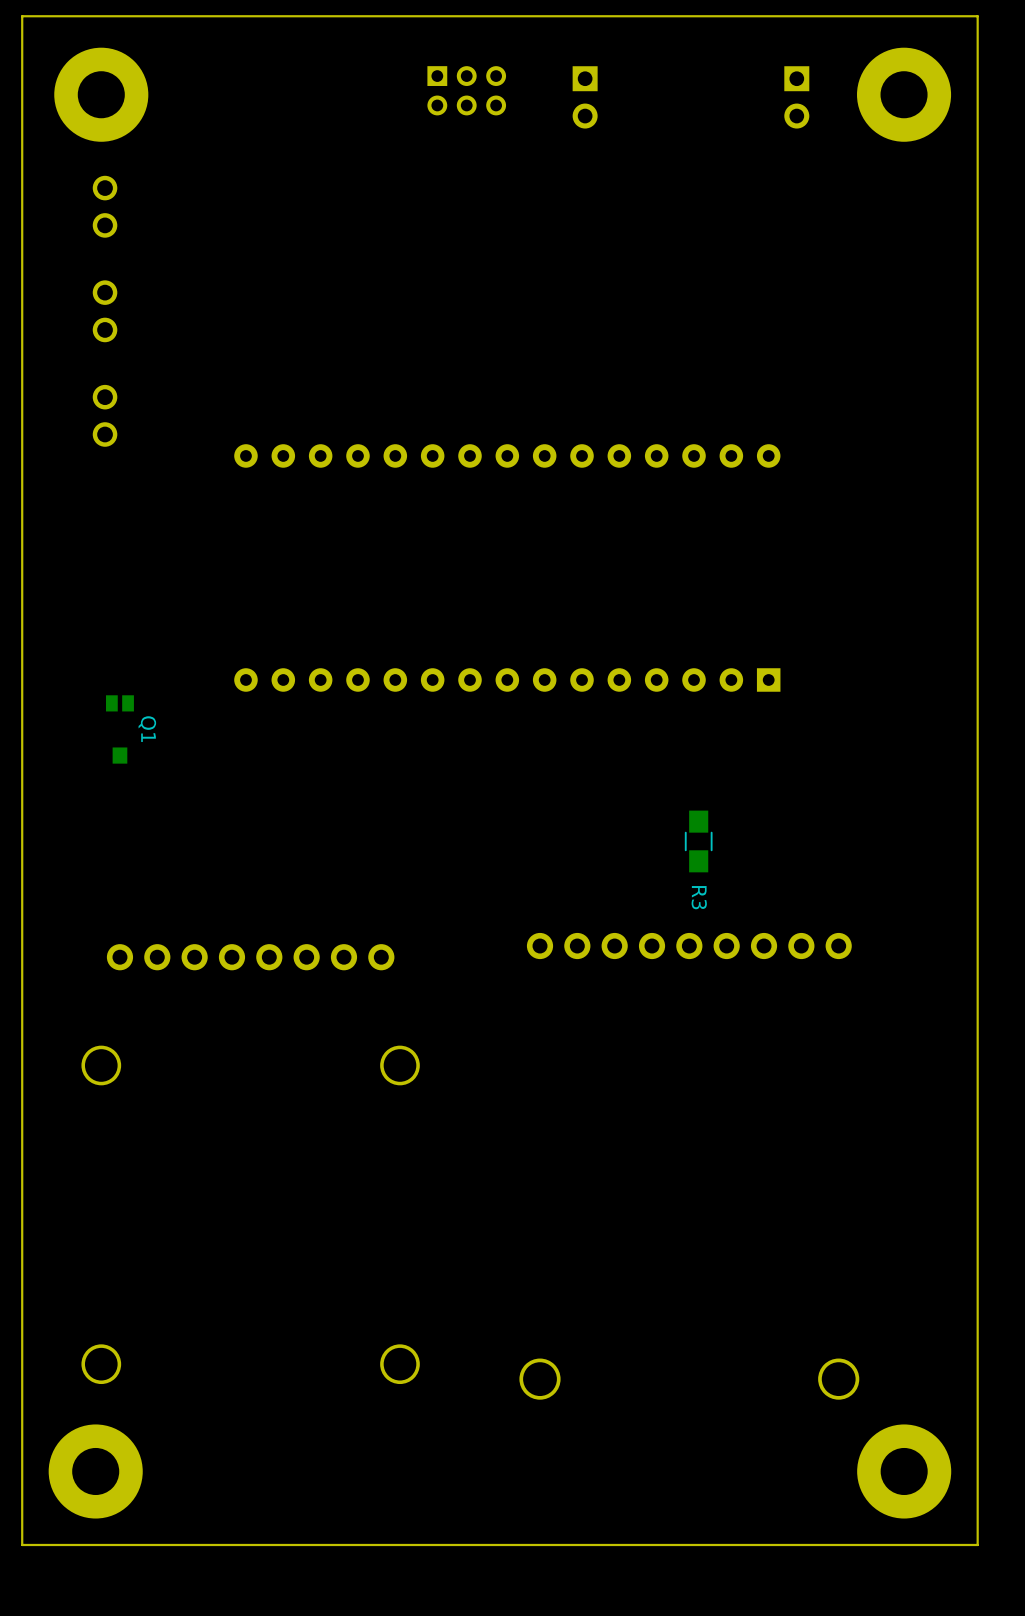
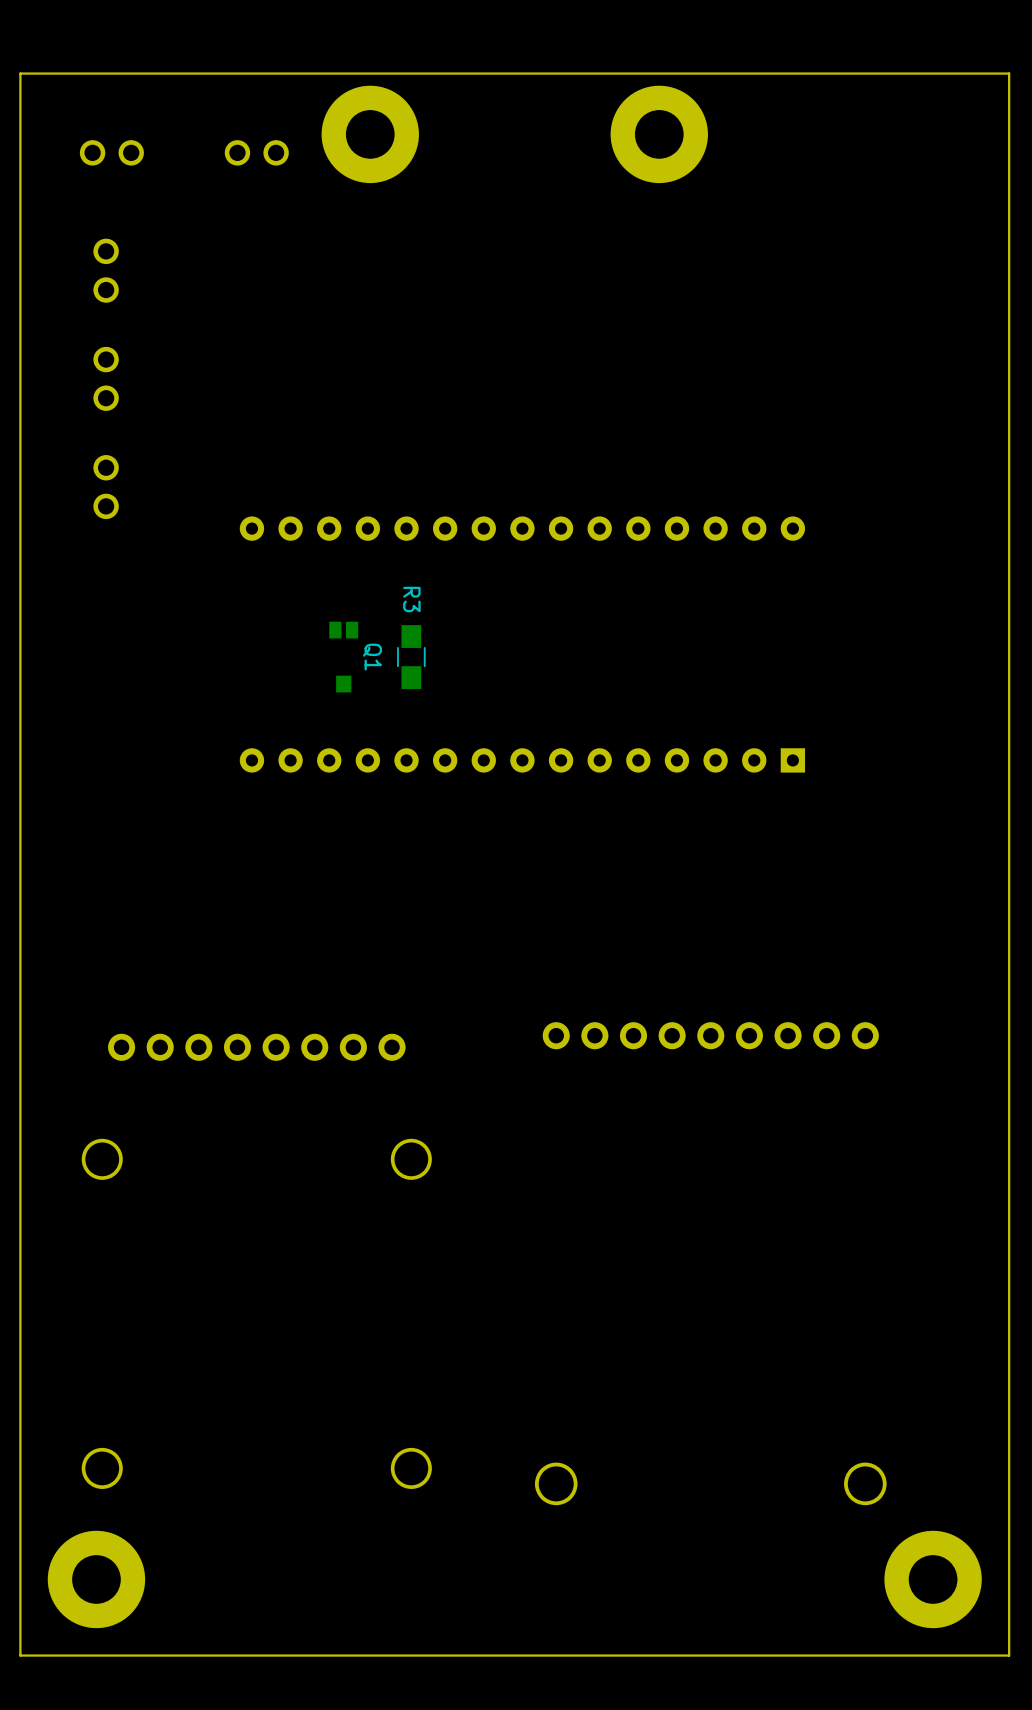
part footprint: [54, 47, 149, 142] -> [79, 140, 144, 166]
part: none -> (370, 134)
part: (466, 90) -> none
part: none -> (256, 152)
part position: (904, 94) -> (659, 134)
part: (585, 97) -> none
part: (796, 97) -> none
Q1 position: (119, 729) -> (343, 657)
R3 position: (698, 841) -> (411, 657)
R3 name position: R3 (699, 897) -> R3 (411, 599)

